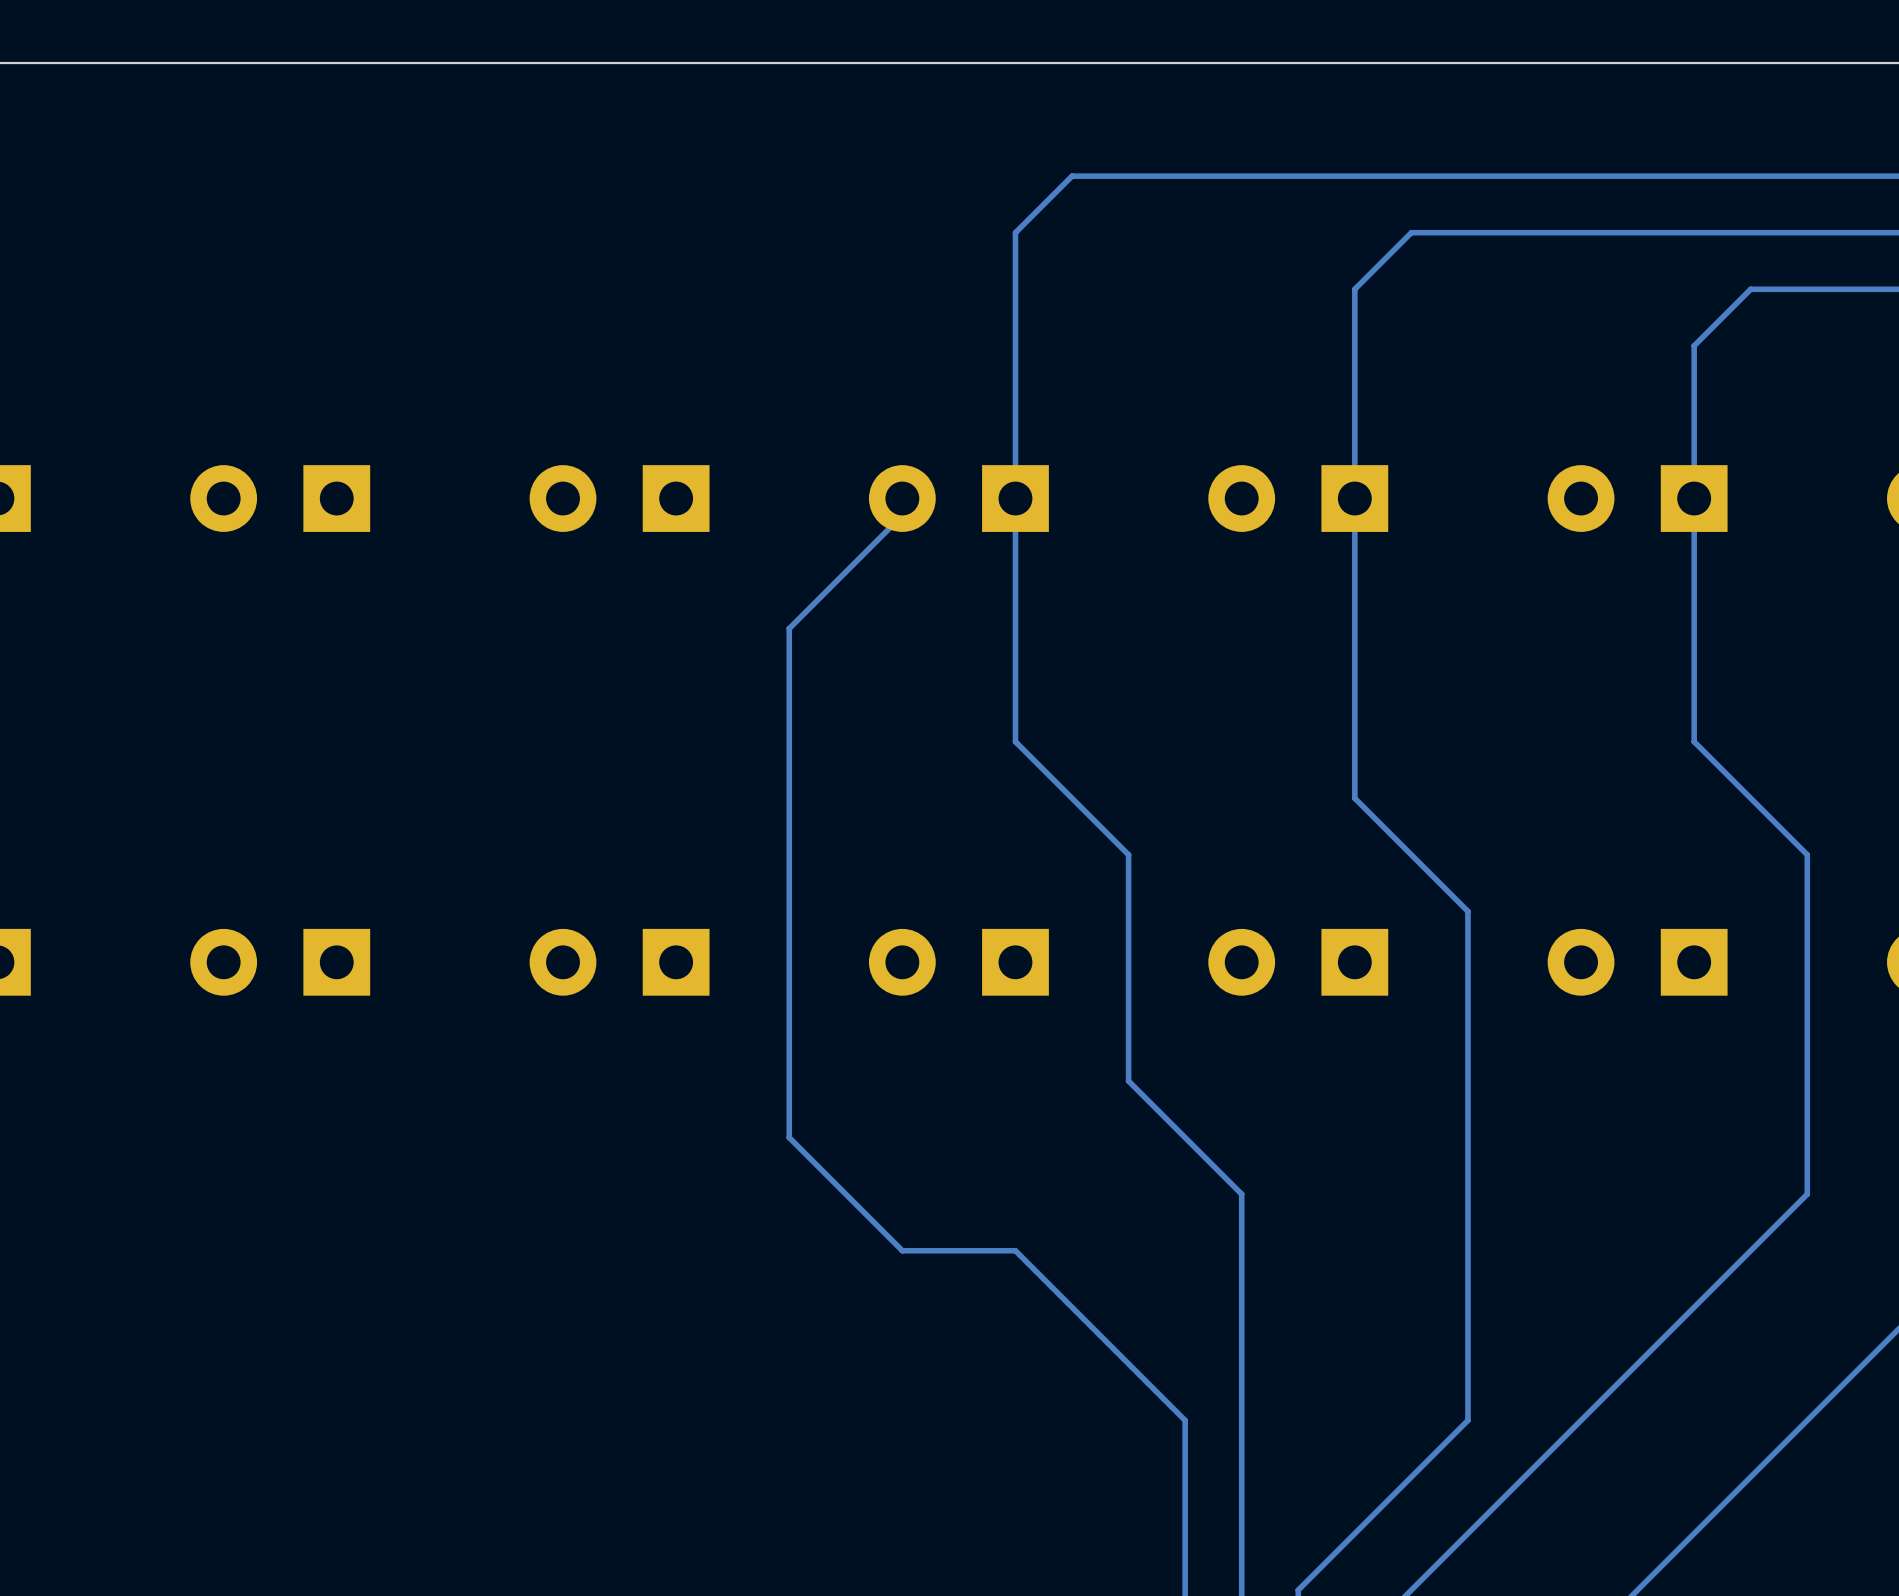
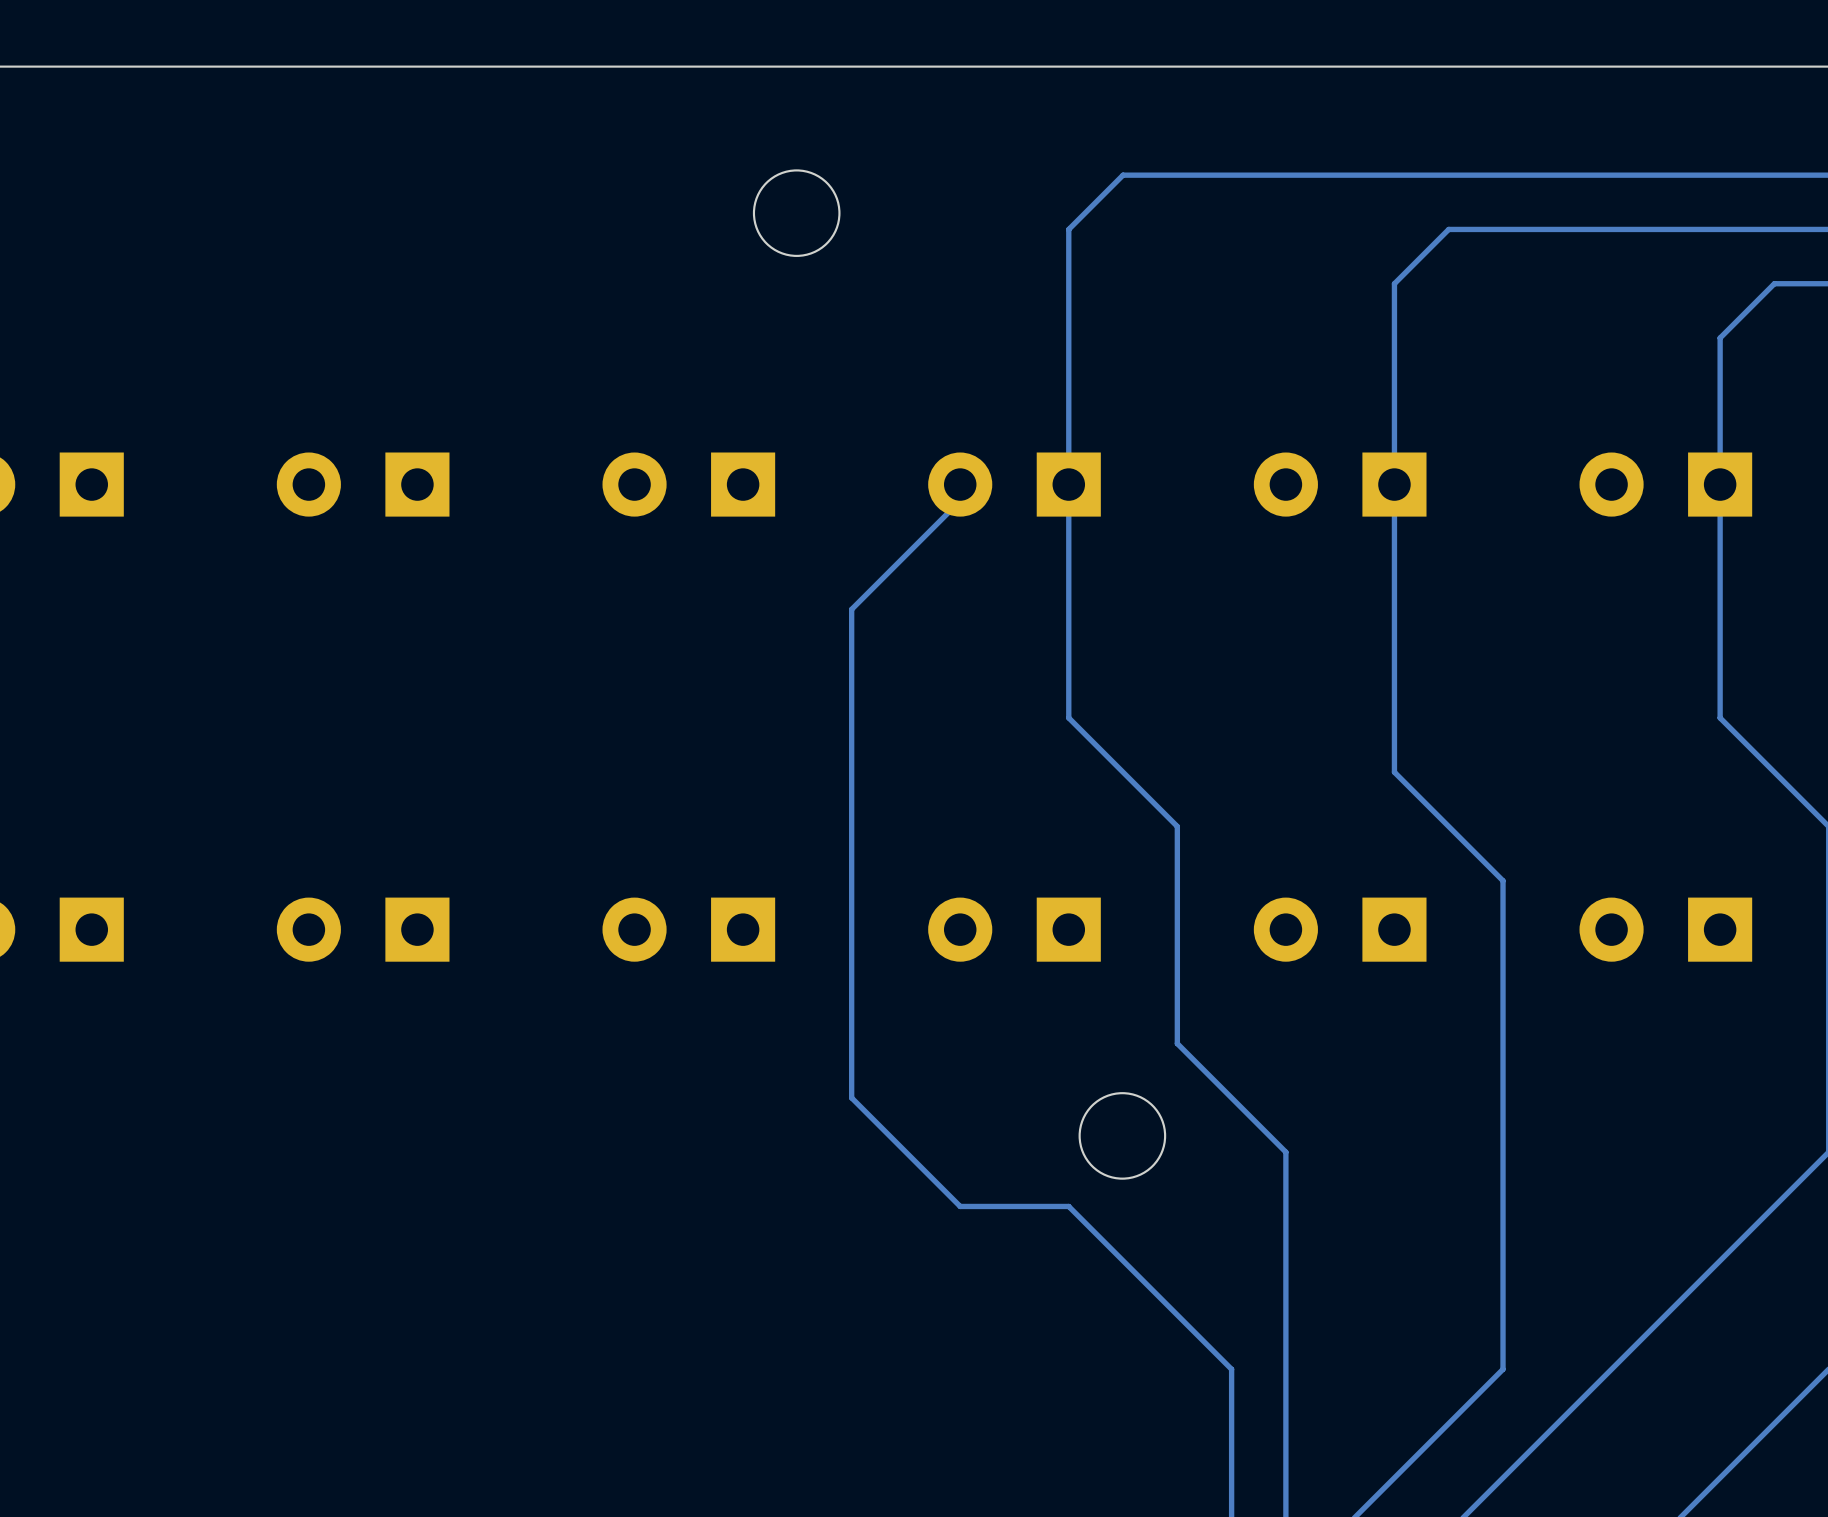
round board edge: none -> [752, 169, 841, 257]
round board edge: none -> [1078, 1092, 1167, 1180]

